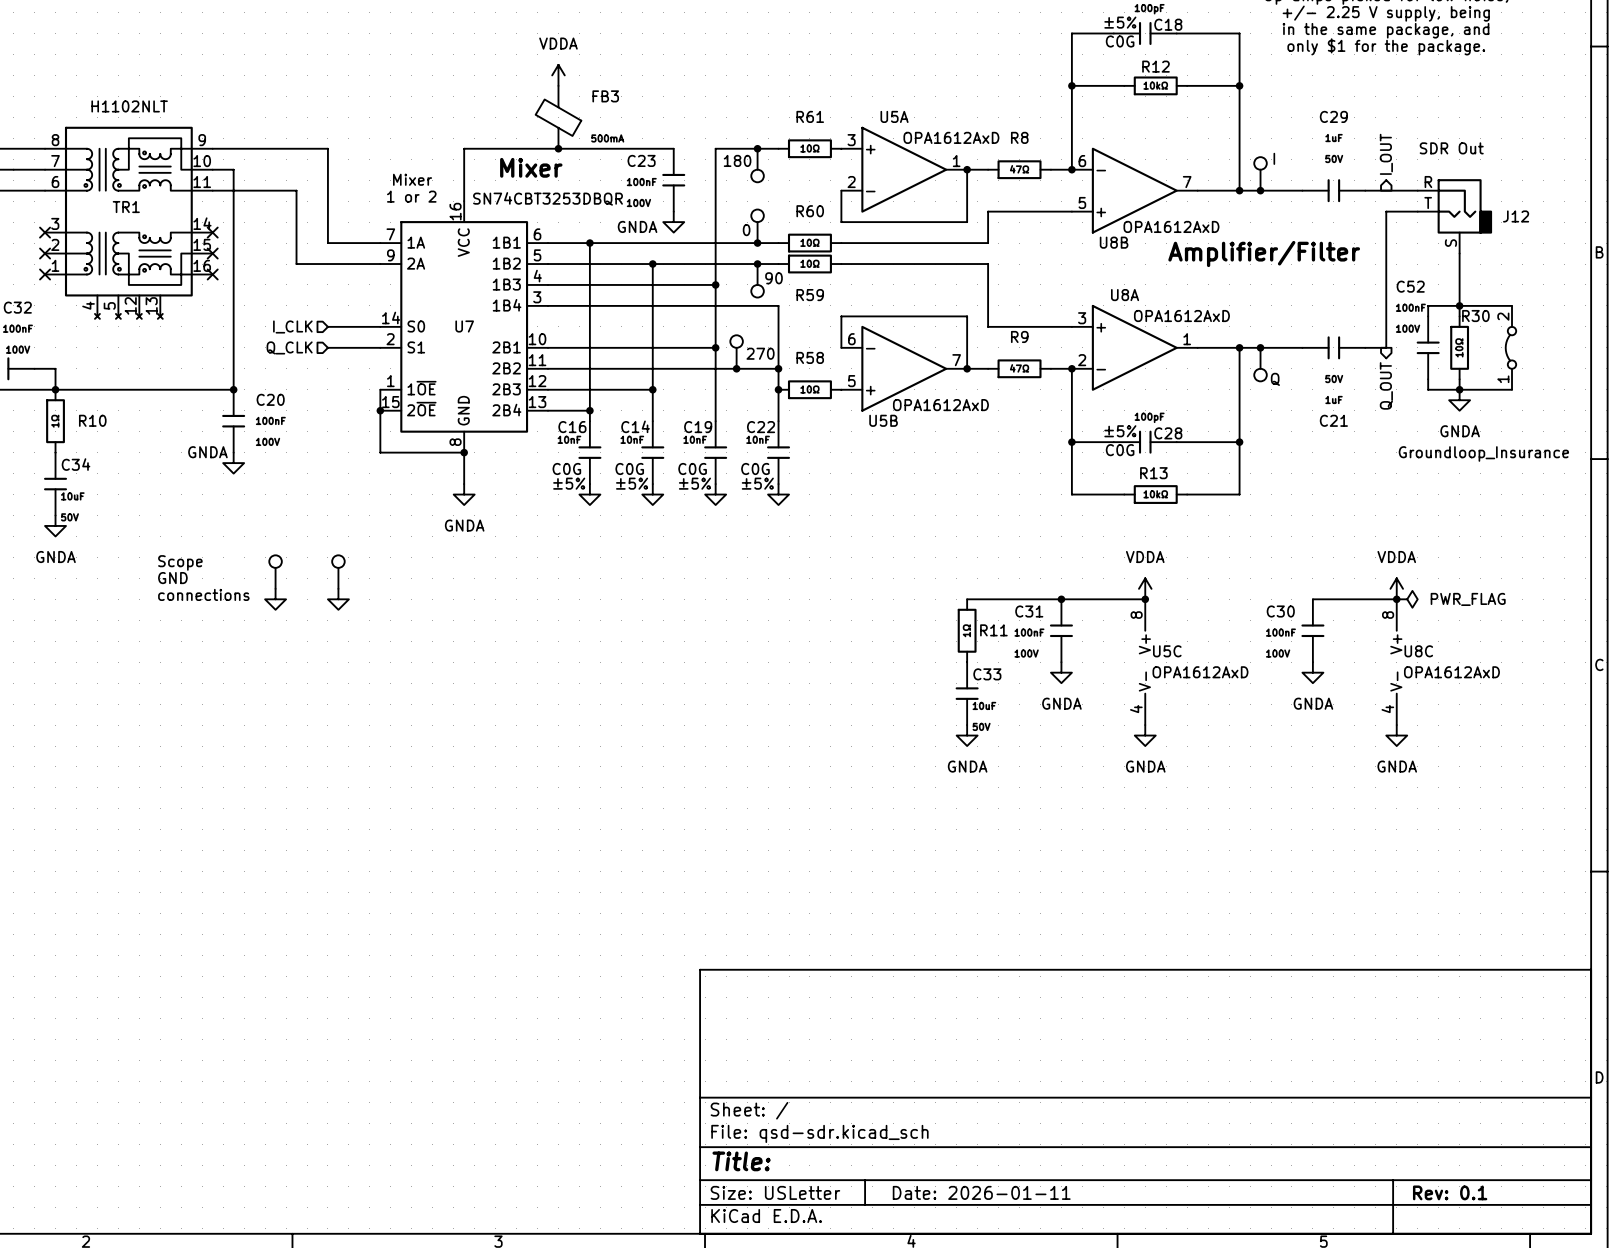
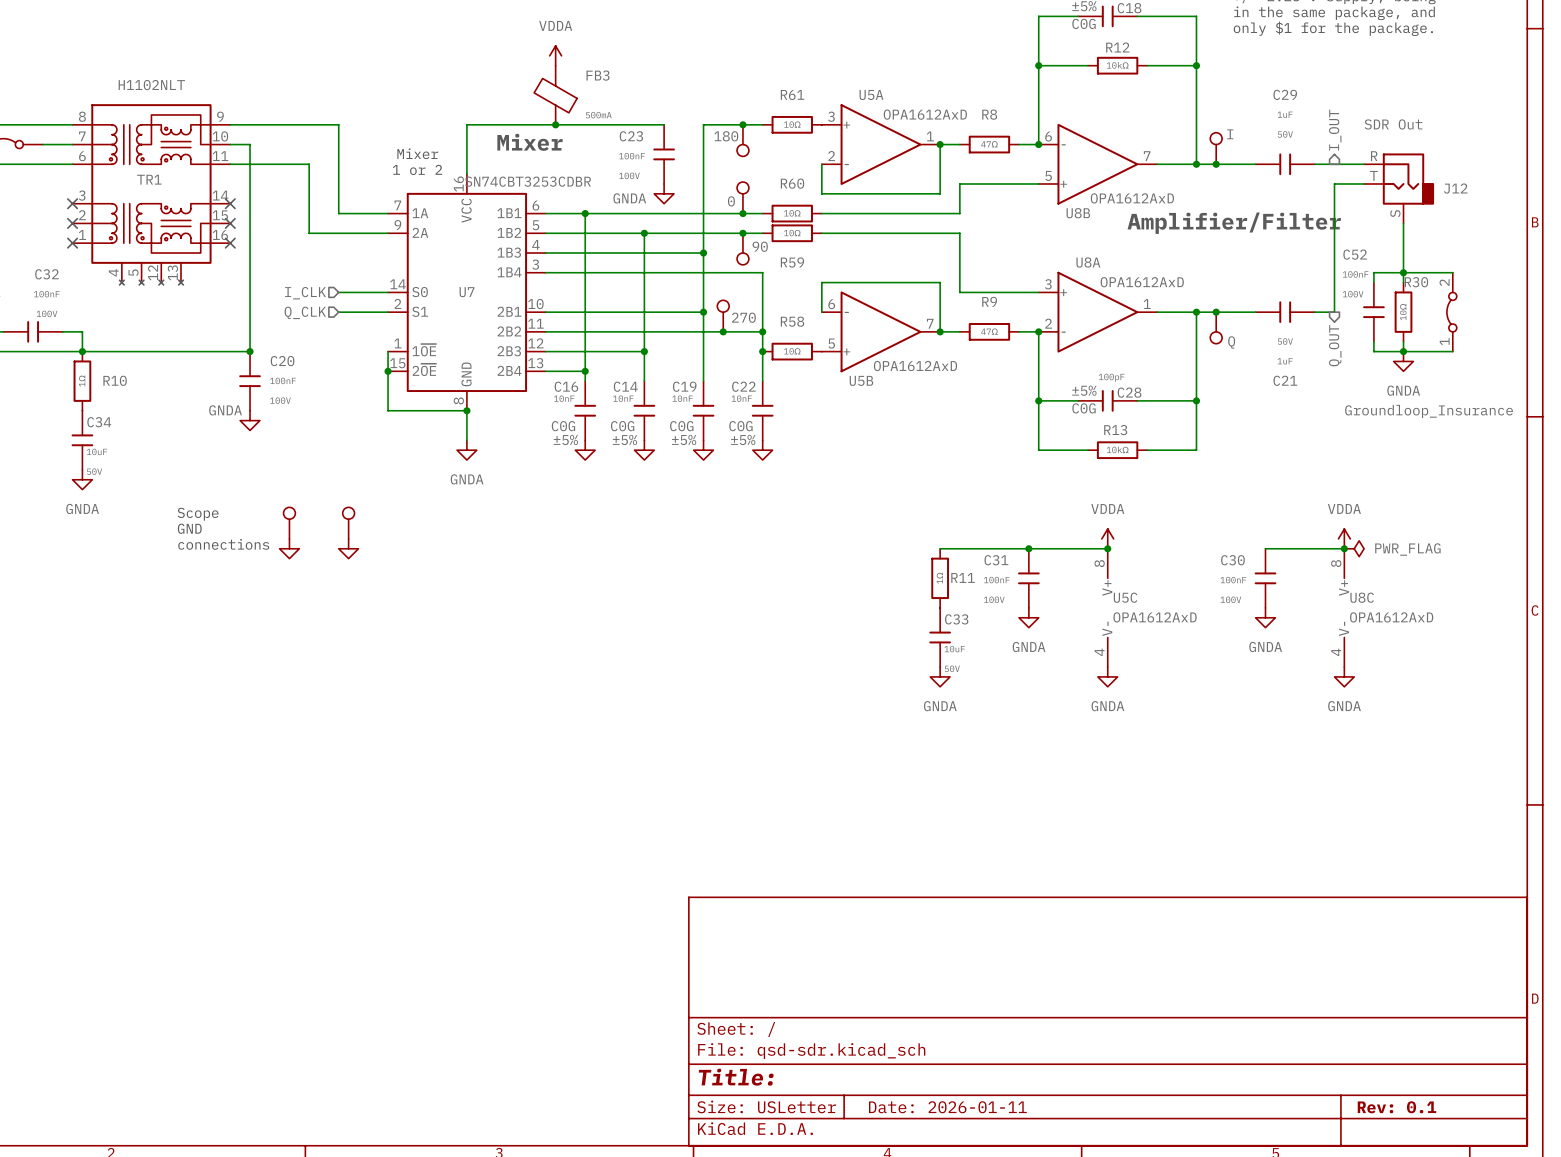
U7 value: SN74CBT3253DBQR (548, 198) -> SN74CBT3253CDBR (528, 181)

